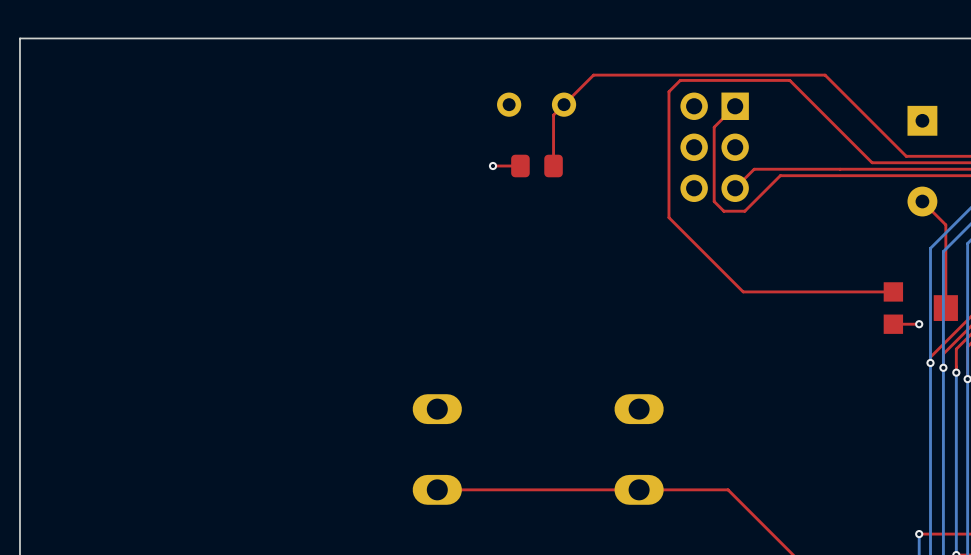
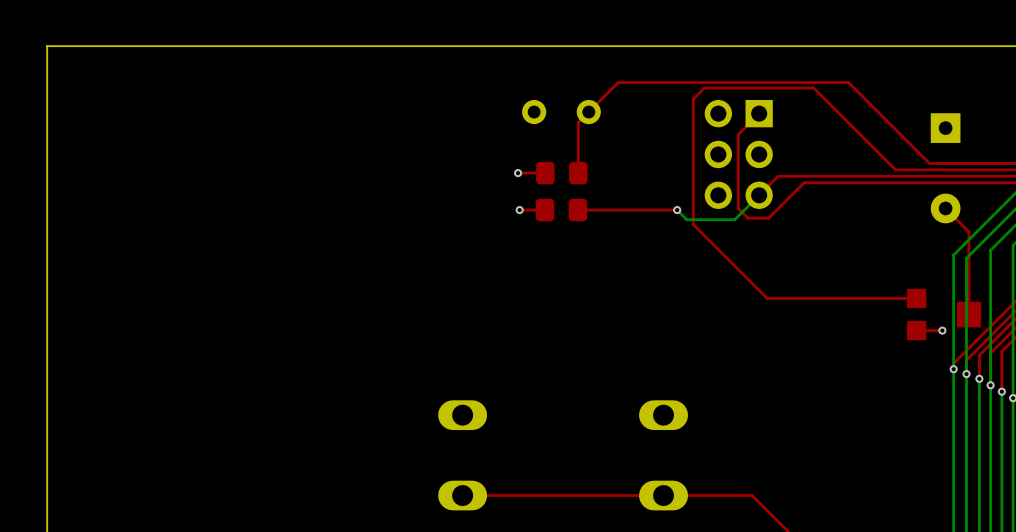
bottom track: none -> (759, 195) (734, 219) (686, 219) (677, 210)
via: none -> (519, 210)
top track: none -> (544, 210) (519, 210)
part: none -> (561, 210)
top track: none -> (677, 210) (577, 210)
via: none -> (677, 210)

